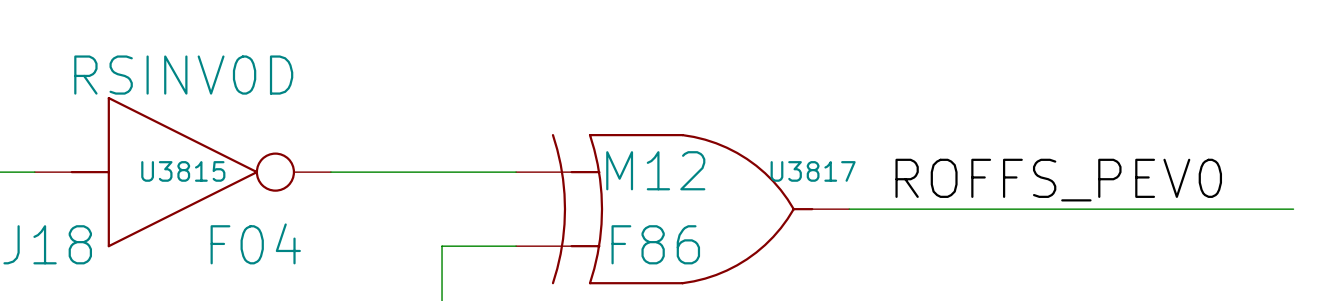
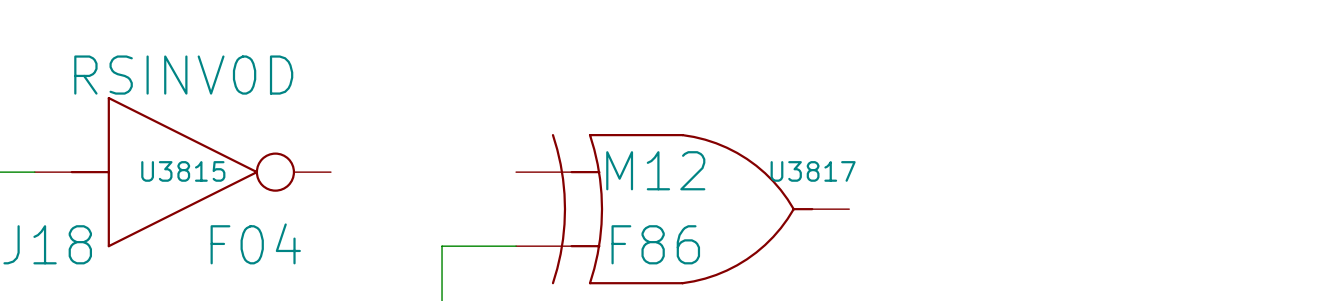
wire: (330, 172) (516, 172) -> none
label: ROFFS_PEV0 (1058, 180) -> none
wire: (849, 209) (1293, 209) -> none

